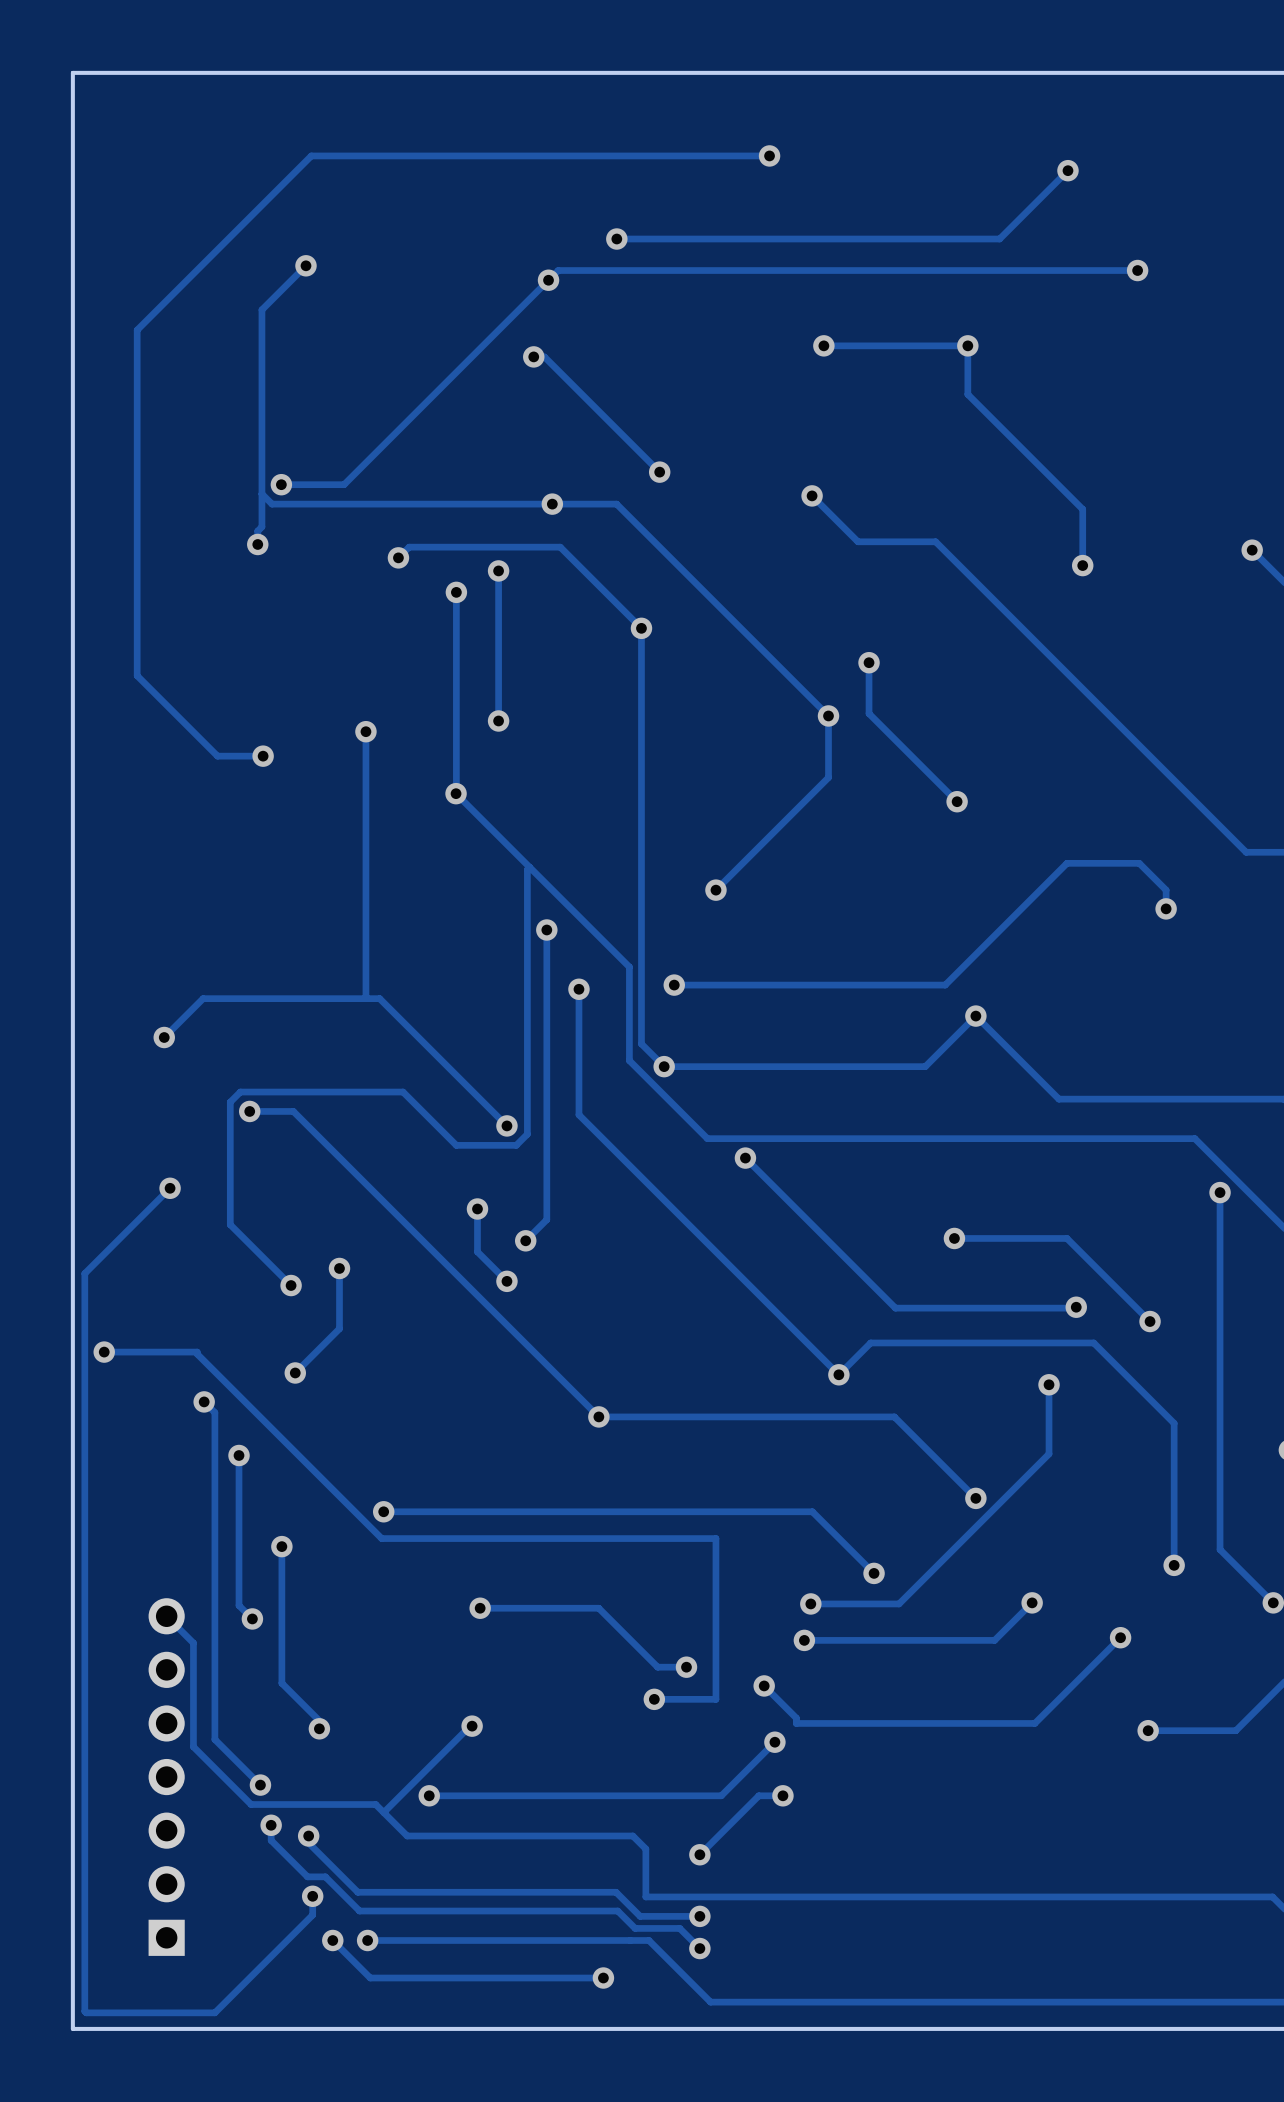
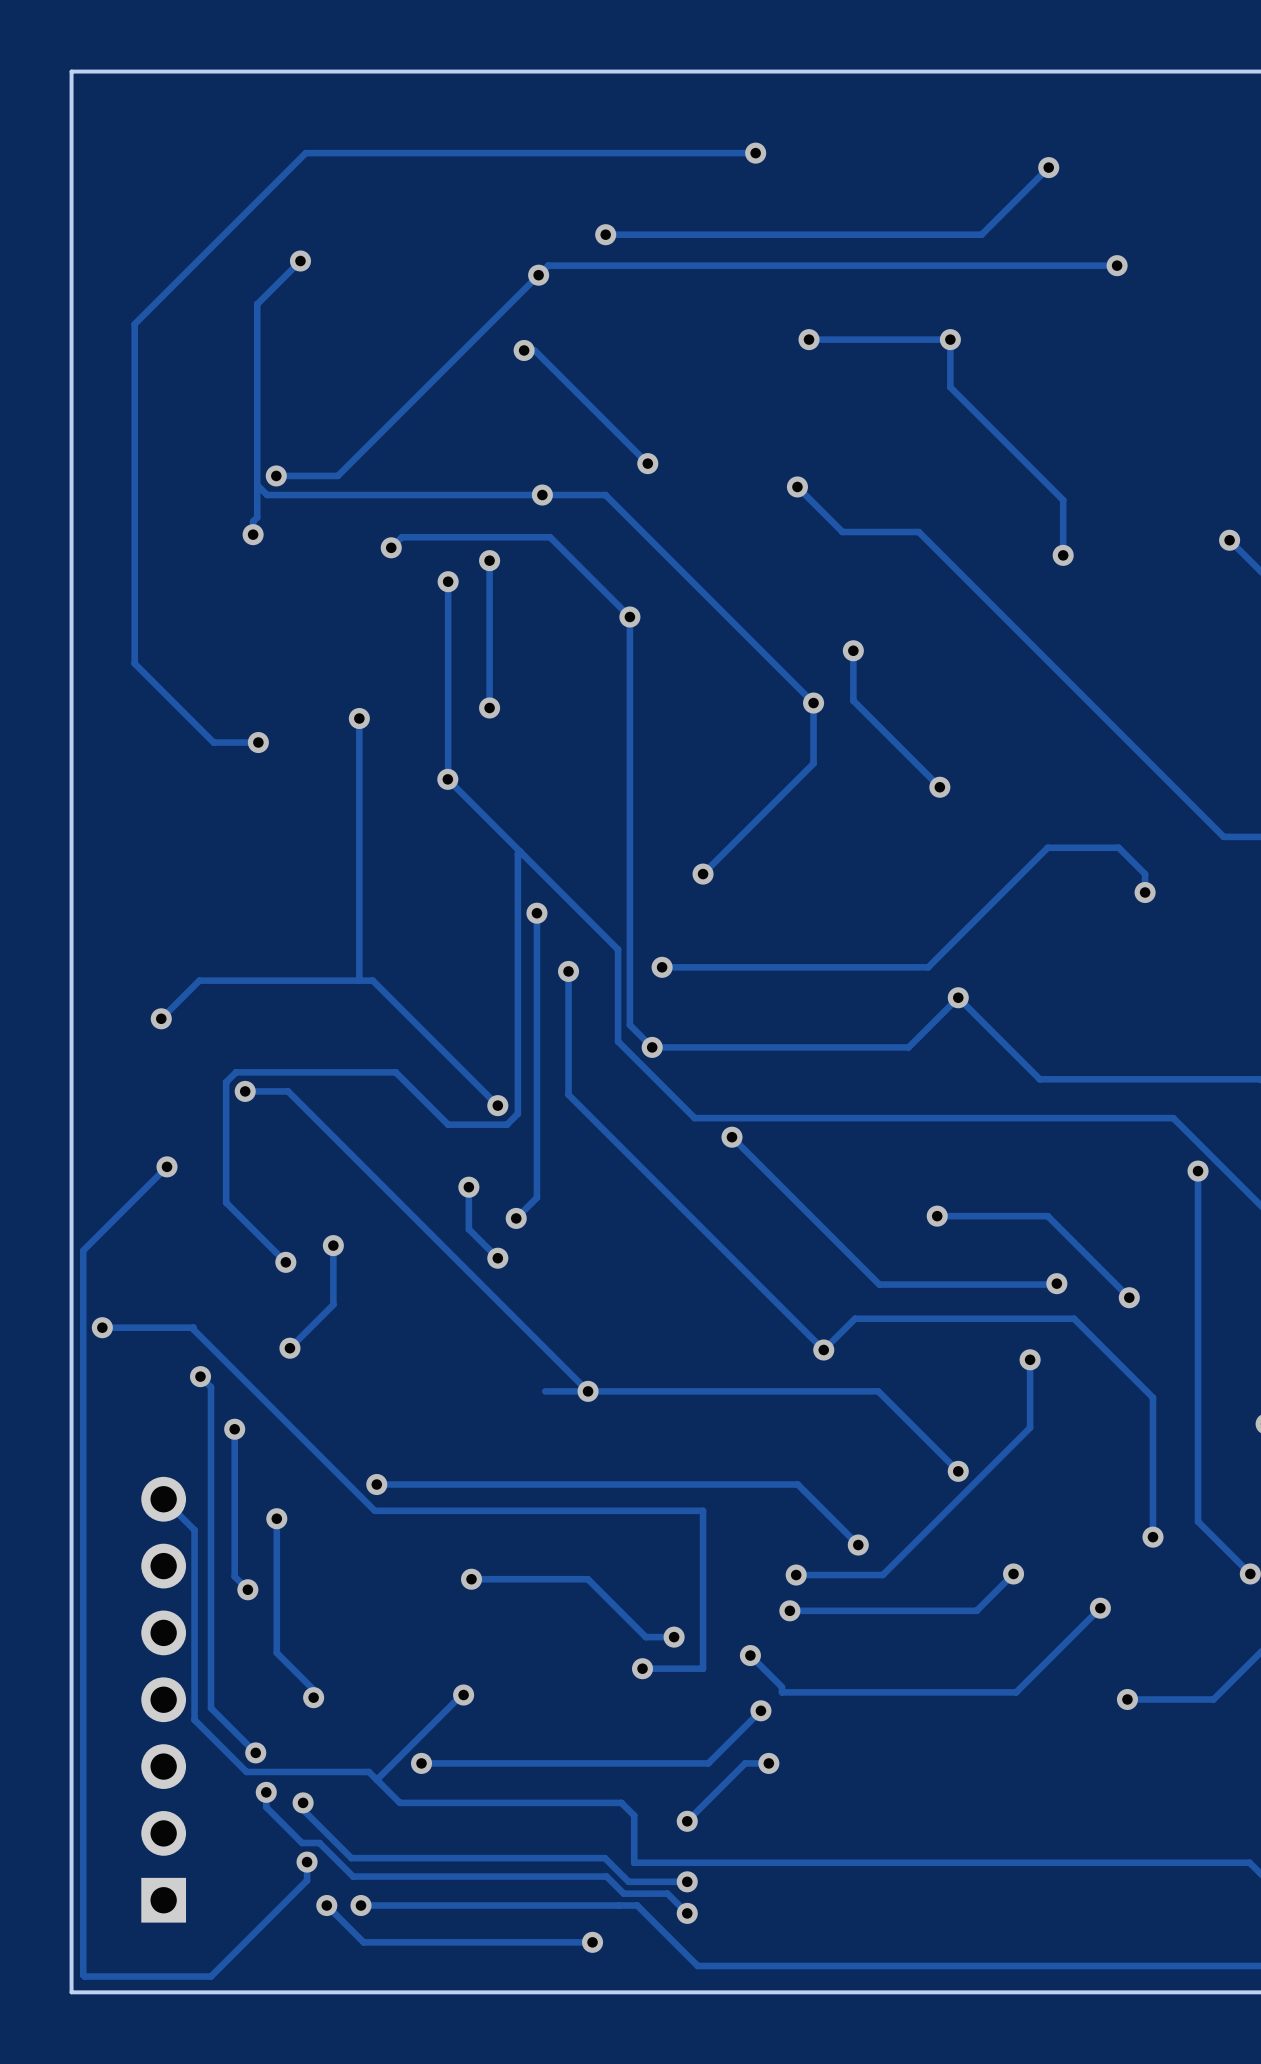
track: none -> (588, 1391) (545, 1391)
track: (166, 1616) (193, 1643) (193, 1746) (198, 1751) -> (163, 1499) (194, 1530) (194, 1719)
part: none -> (163, 1699)
part: (166, 1777) -> none

